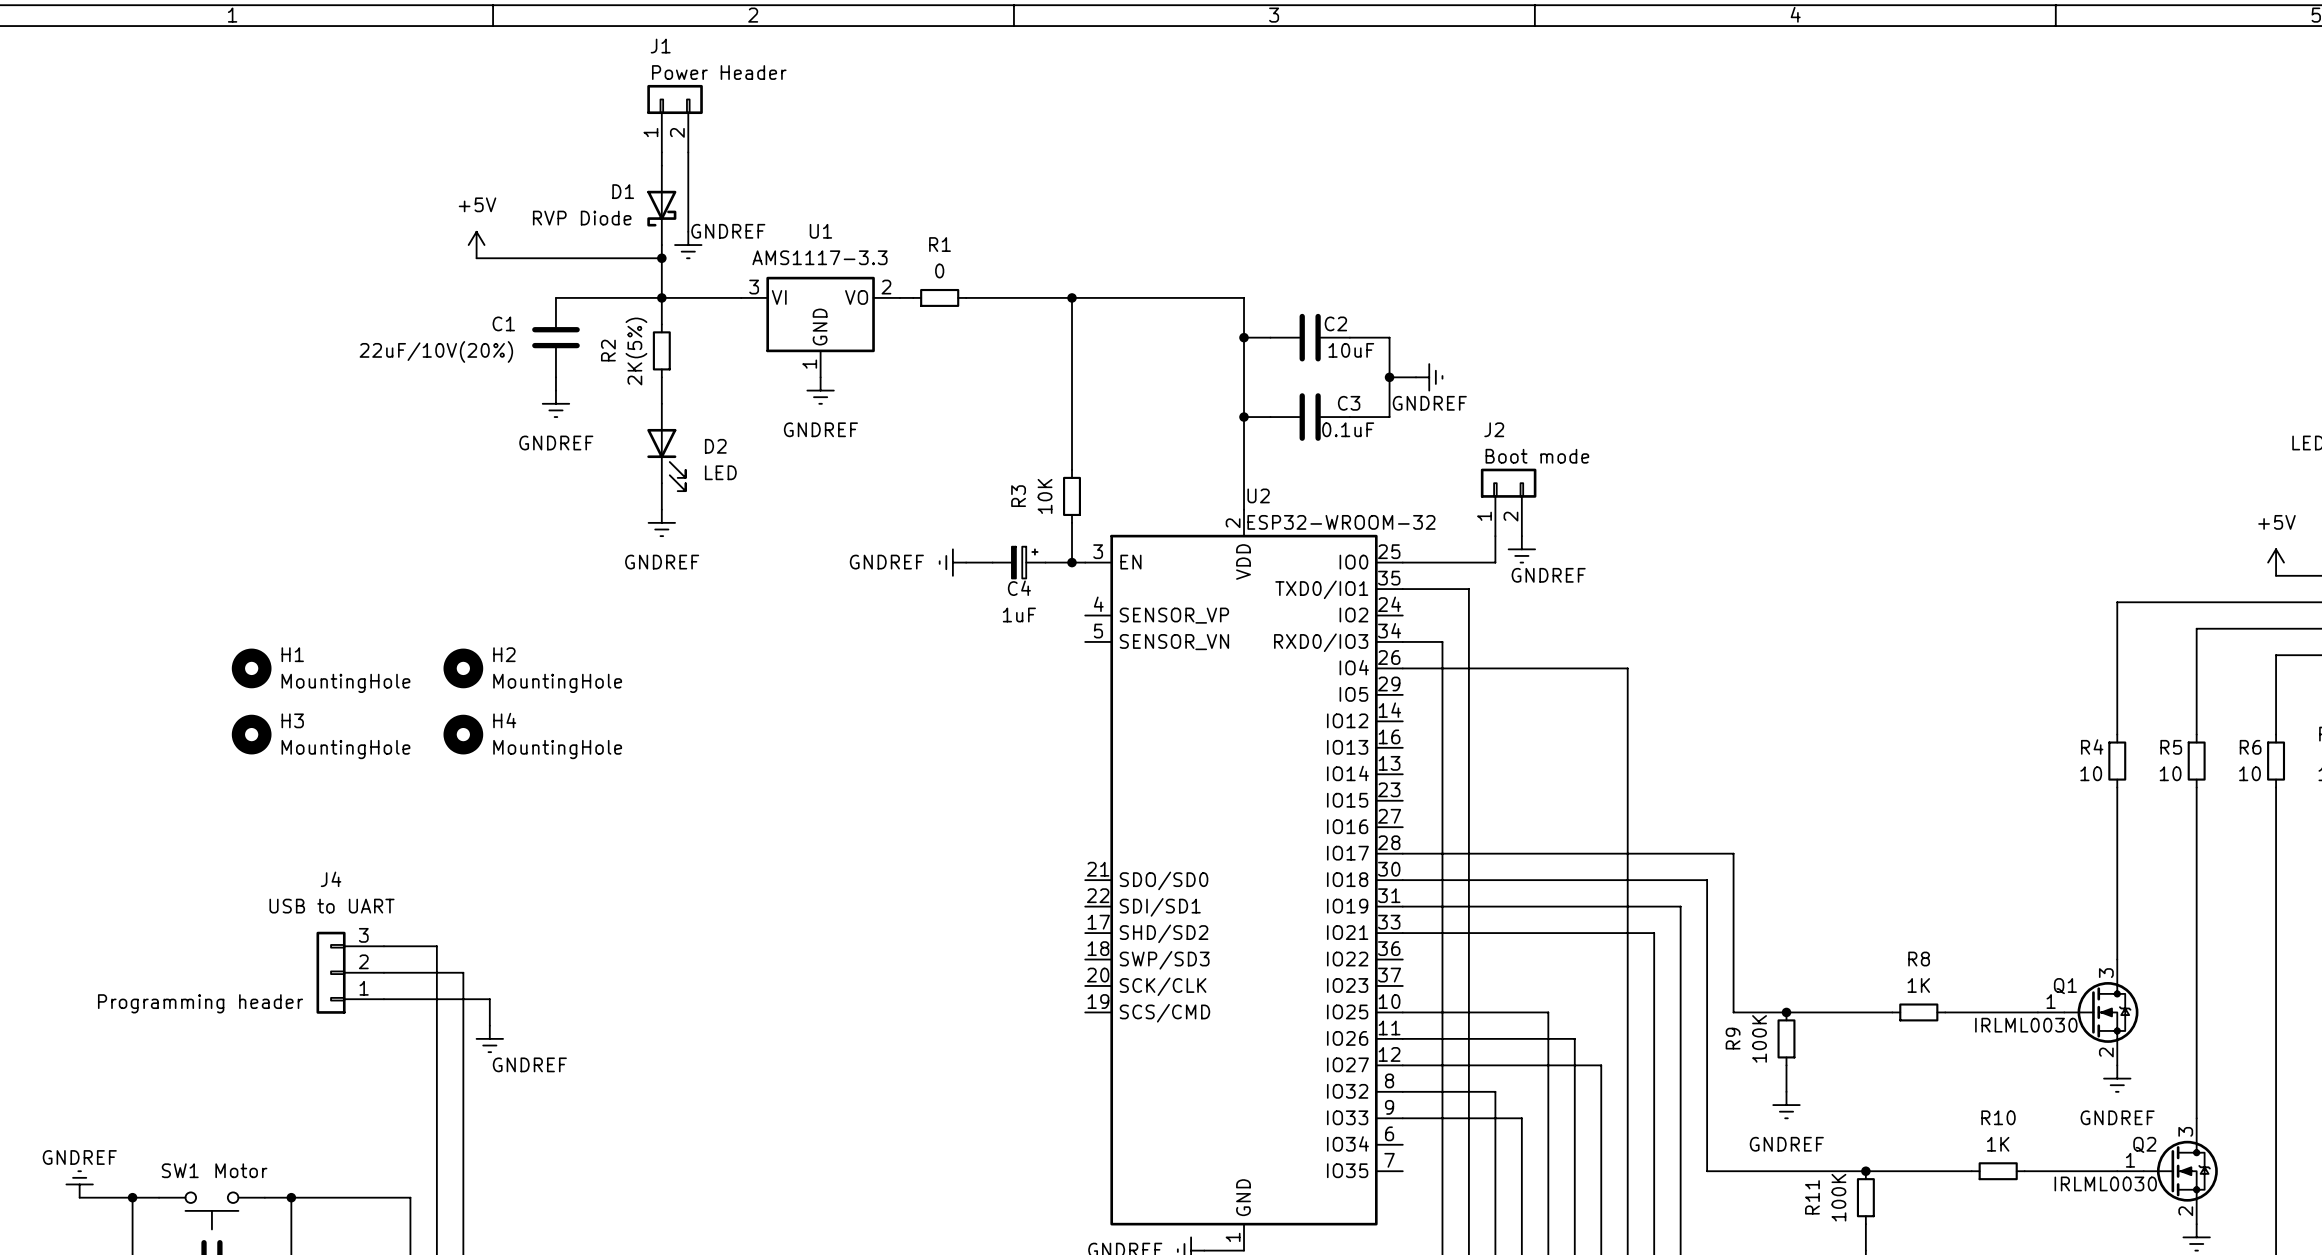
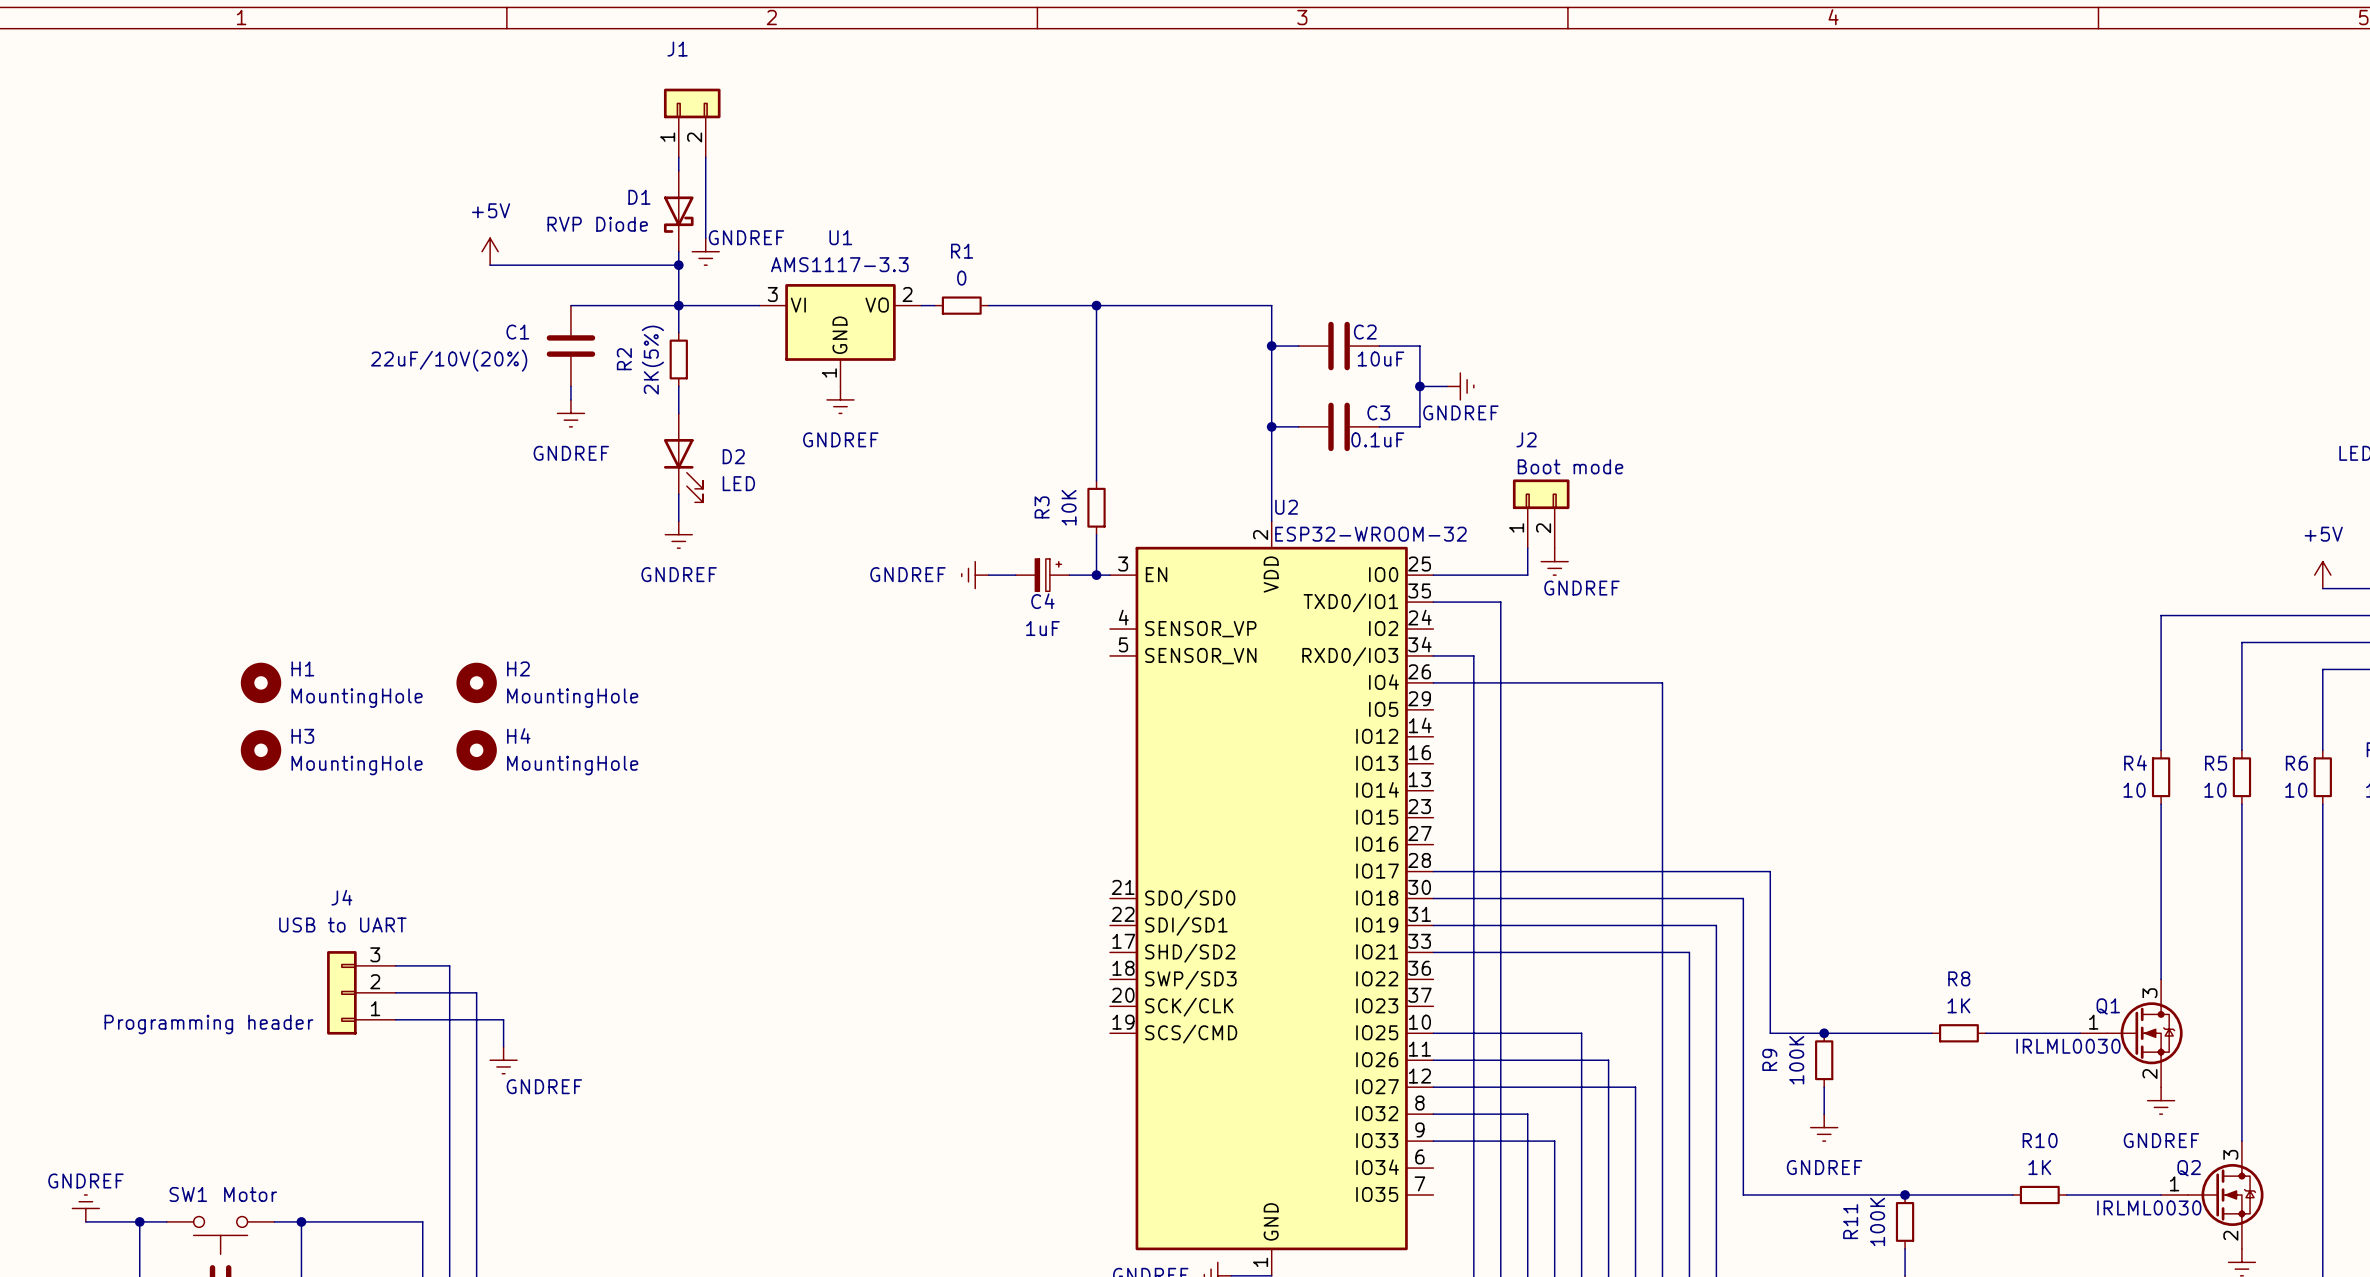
J1 value: Power Header (719, 72) -> none

